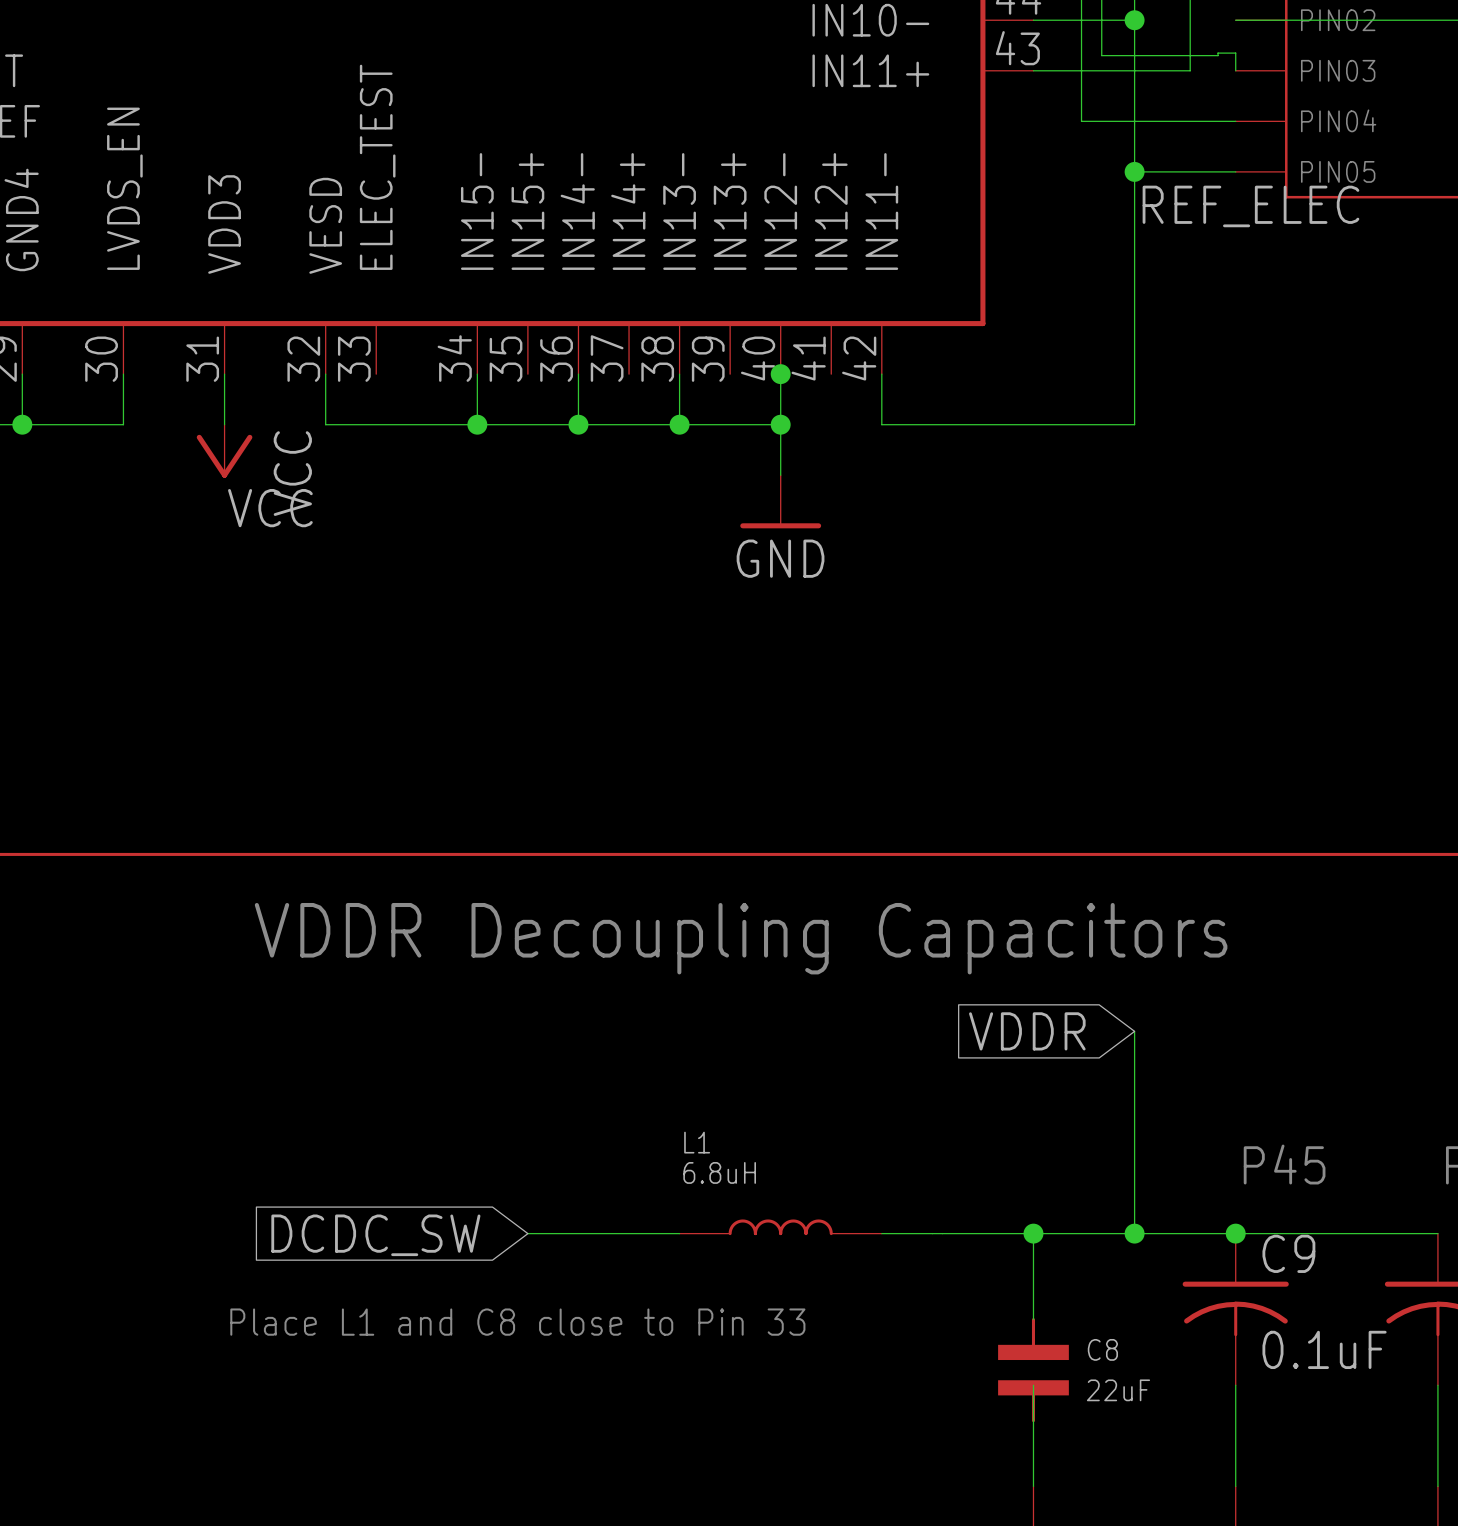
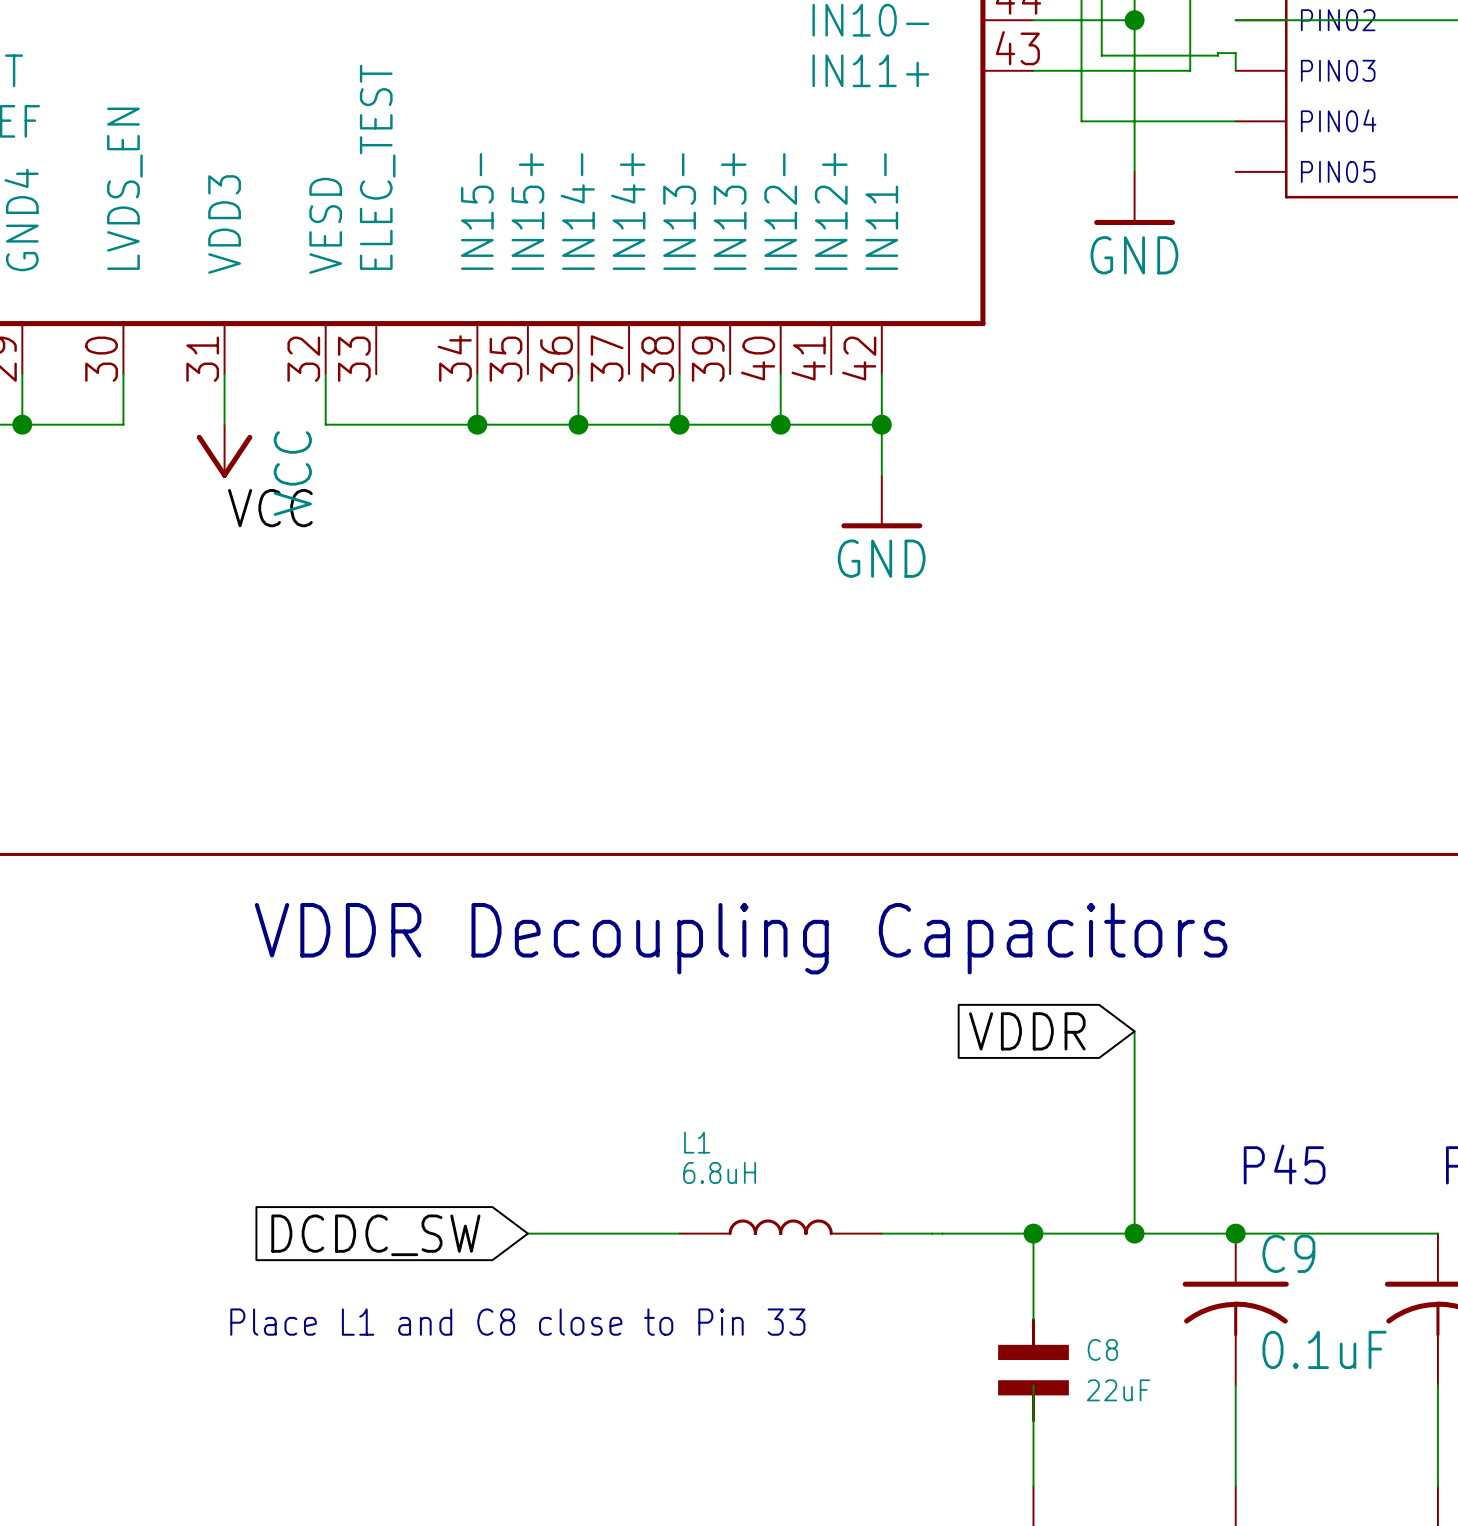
junction: (1134, 171) -> none
wire: (1235, 171) (1134, 171) (1134, 424) (881, 424) -> none
power symbol: none -> GND (1134, 198)
label: REF_ELEC (1250, 206) -> none
junction position: (780, 374) -> (881, 424)
wire: (780, 424) (780, 475) -> (780, 424) (881, 424) (881, 475)
power symbol position: GND (780, 501) -> GND (881, 501)

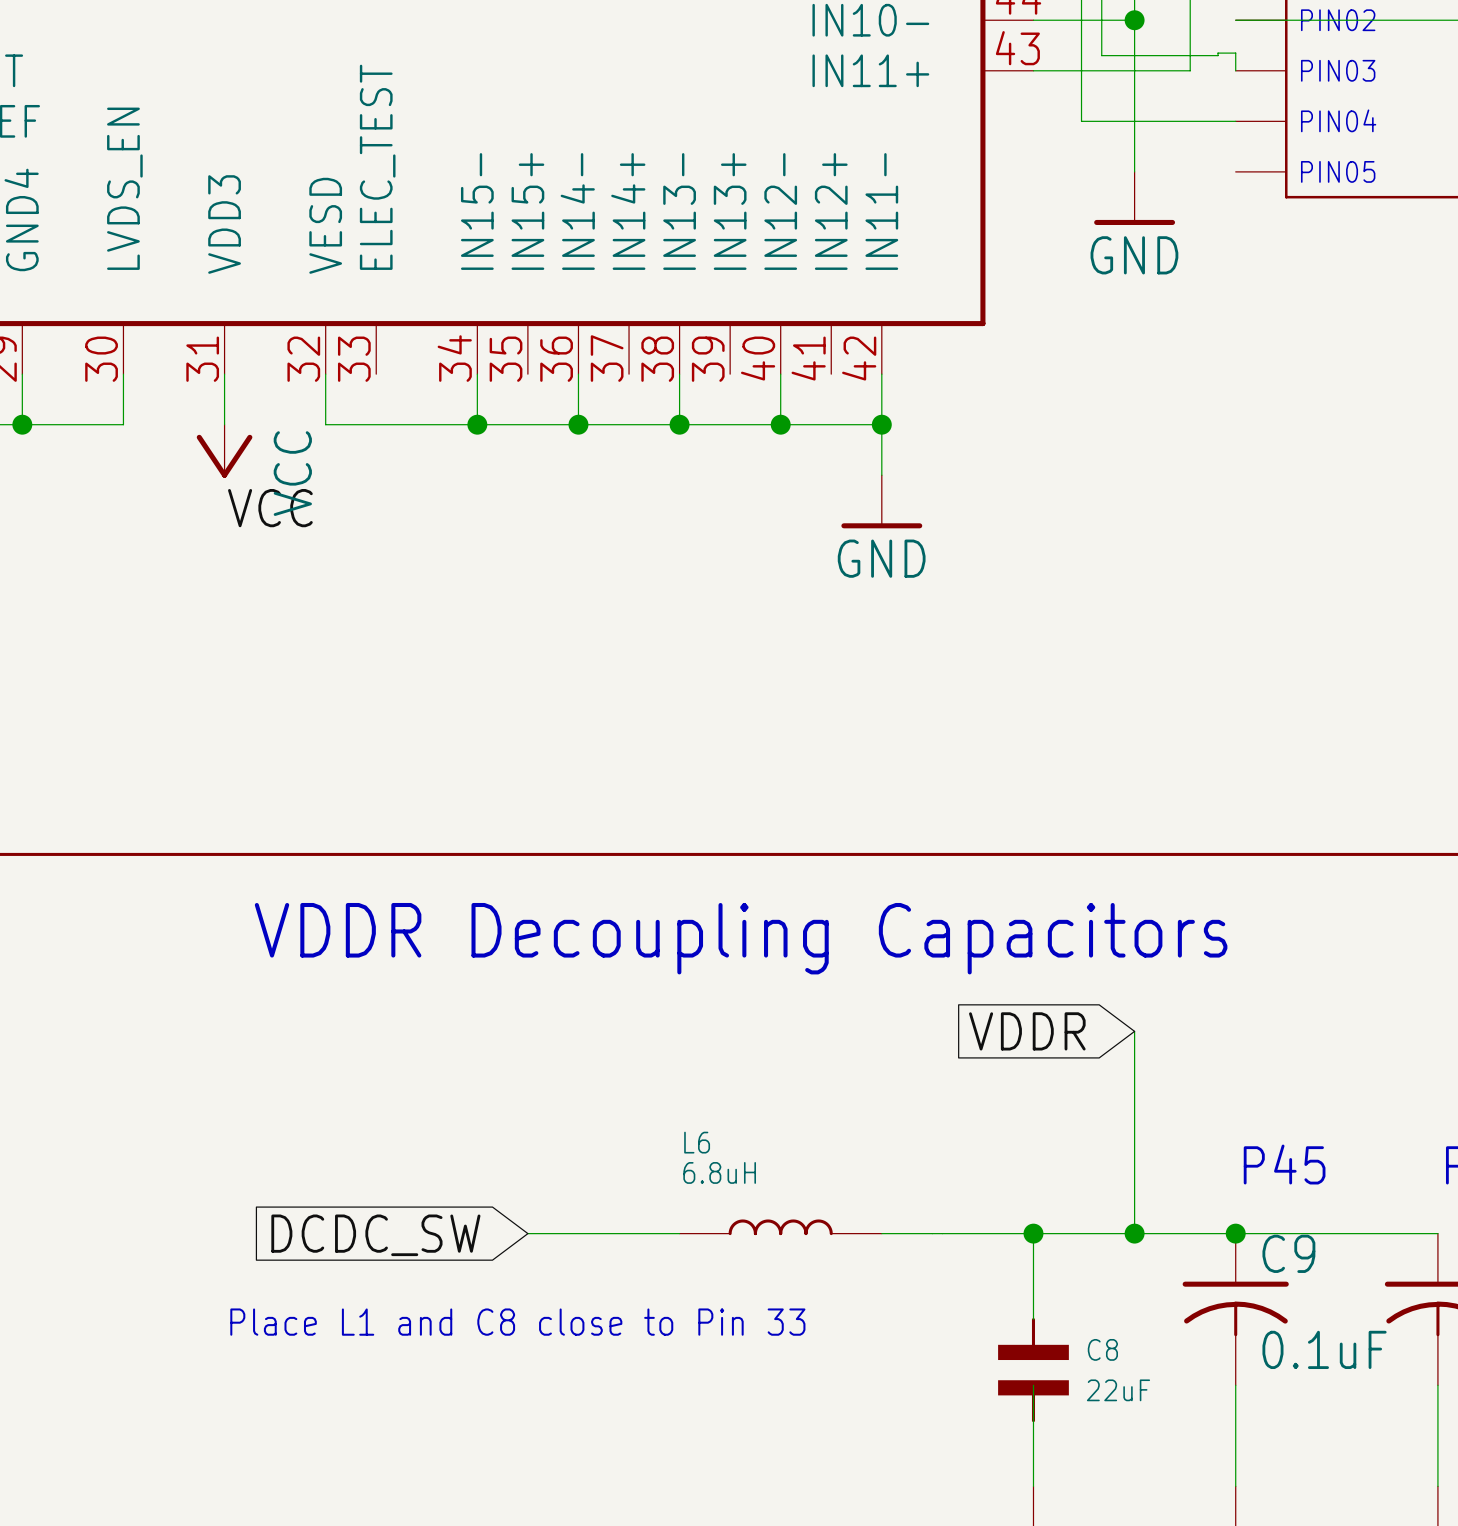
L1 name: L1 (697, 1142) -> L6 (697, 1142)

